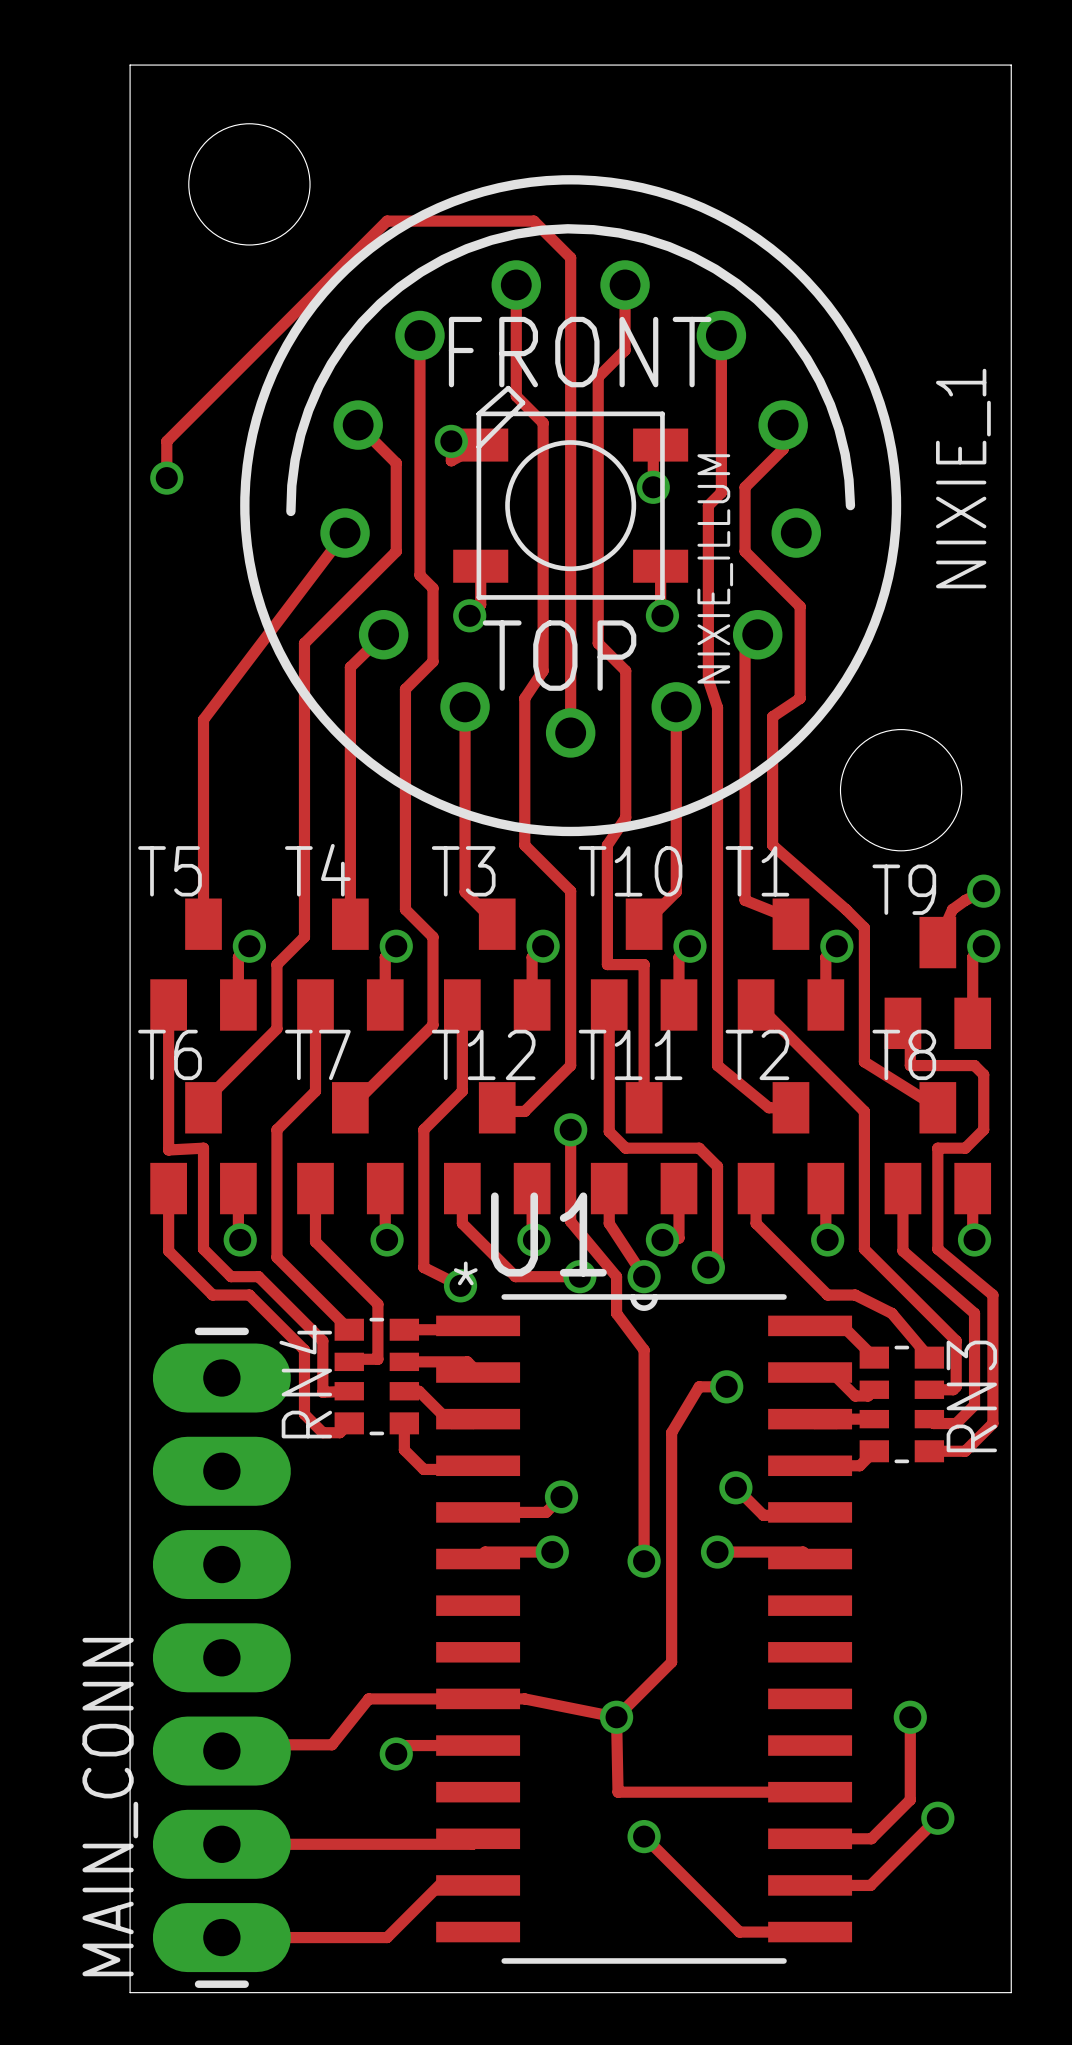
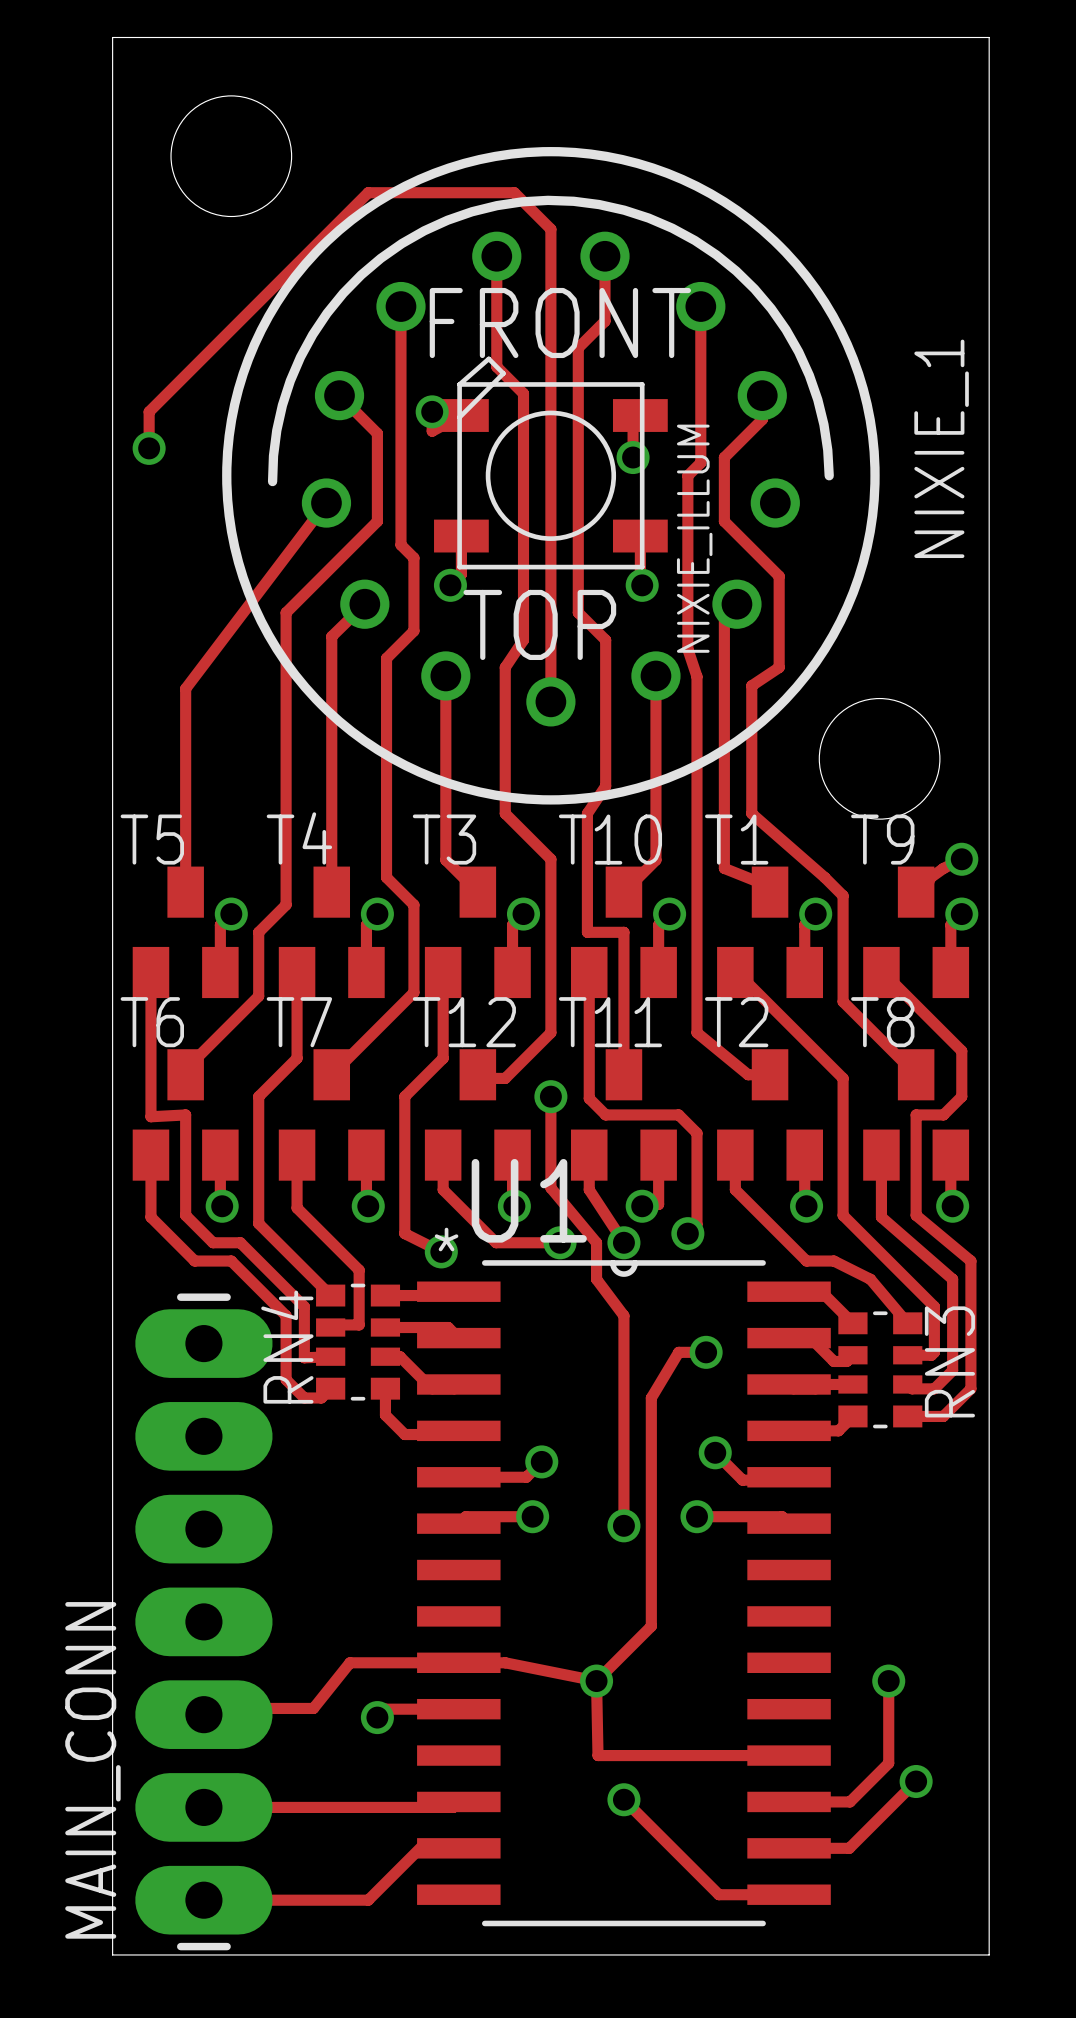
T9 position: (937, 982) -> (916, 932)
track: (902, 1023) (910, 1030) (910, 1065) (974, 1065) (983, 1074) (983, 1083) -> (881, 972) (961, 1051)
track: (864, 1034) (864, 1061) (937, 1107) -> (843, 1001) (916, 1074)

